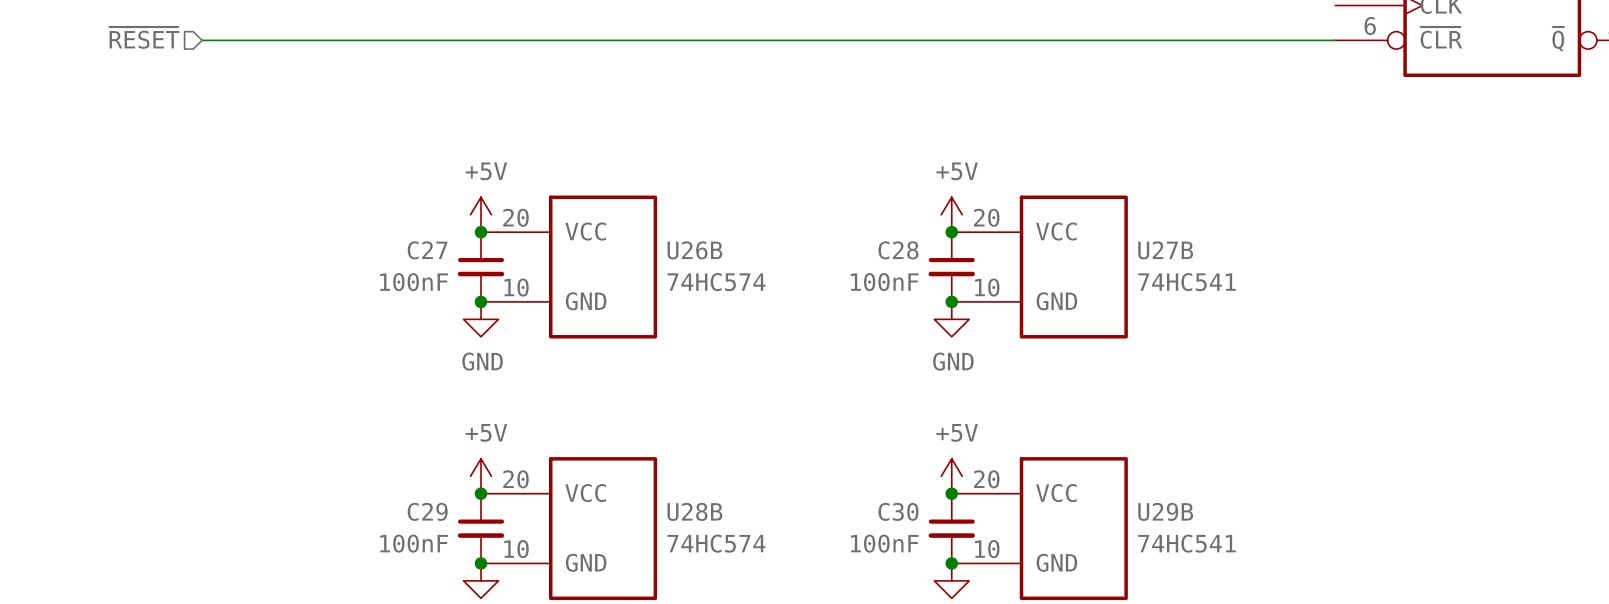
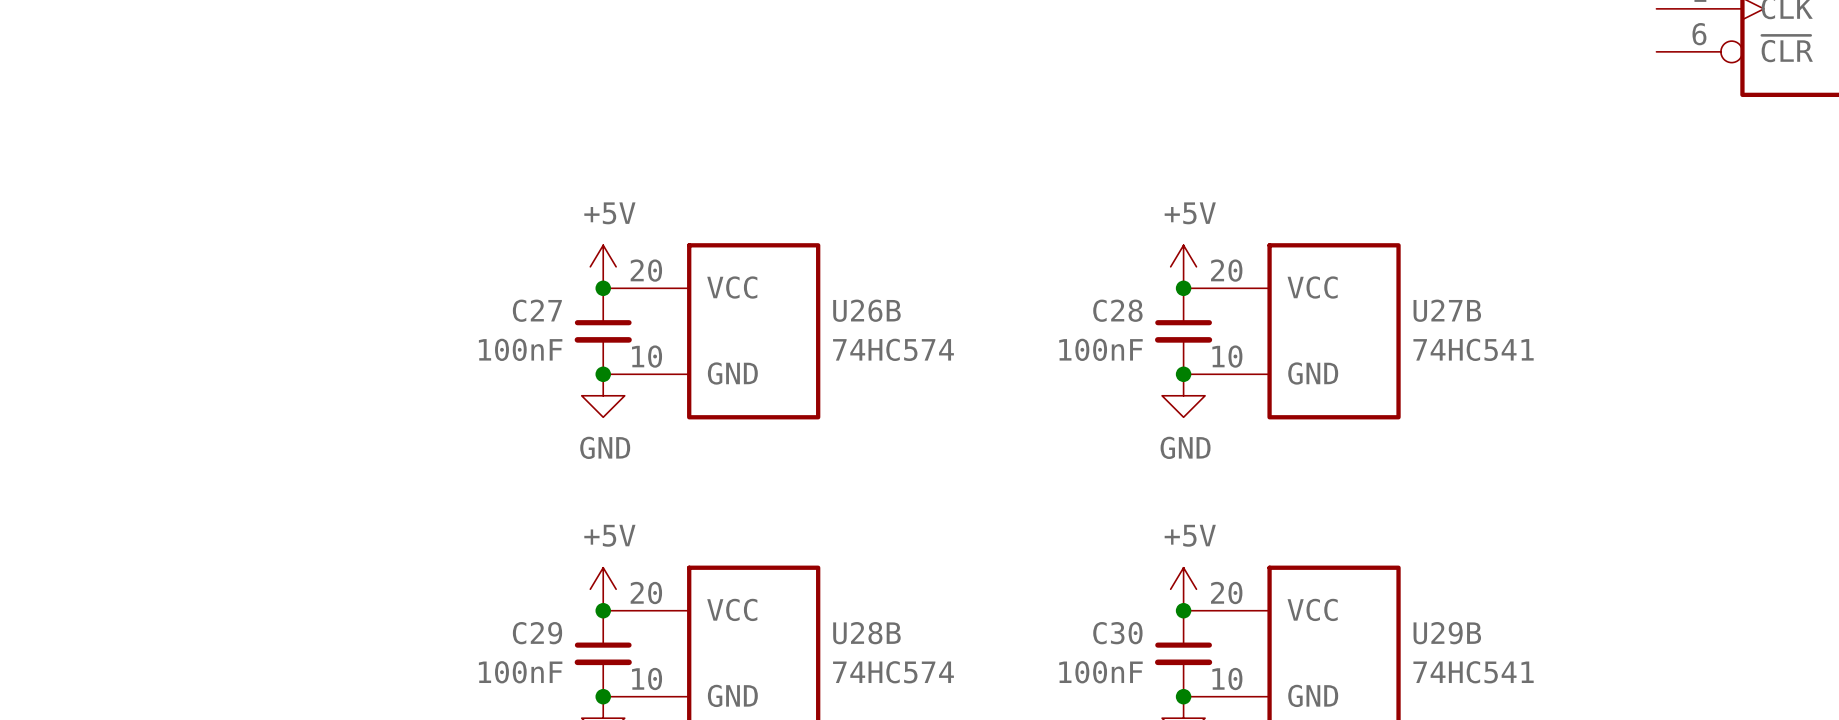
hierarchical label: ~{RESET} (144, 37) -> none
wire: (202, 40) (1335, 40) -> none

